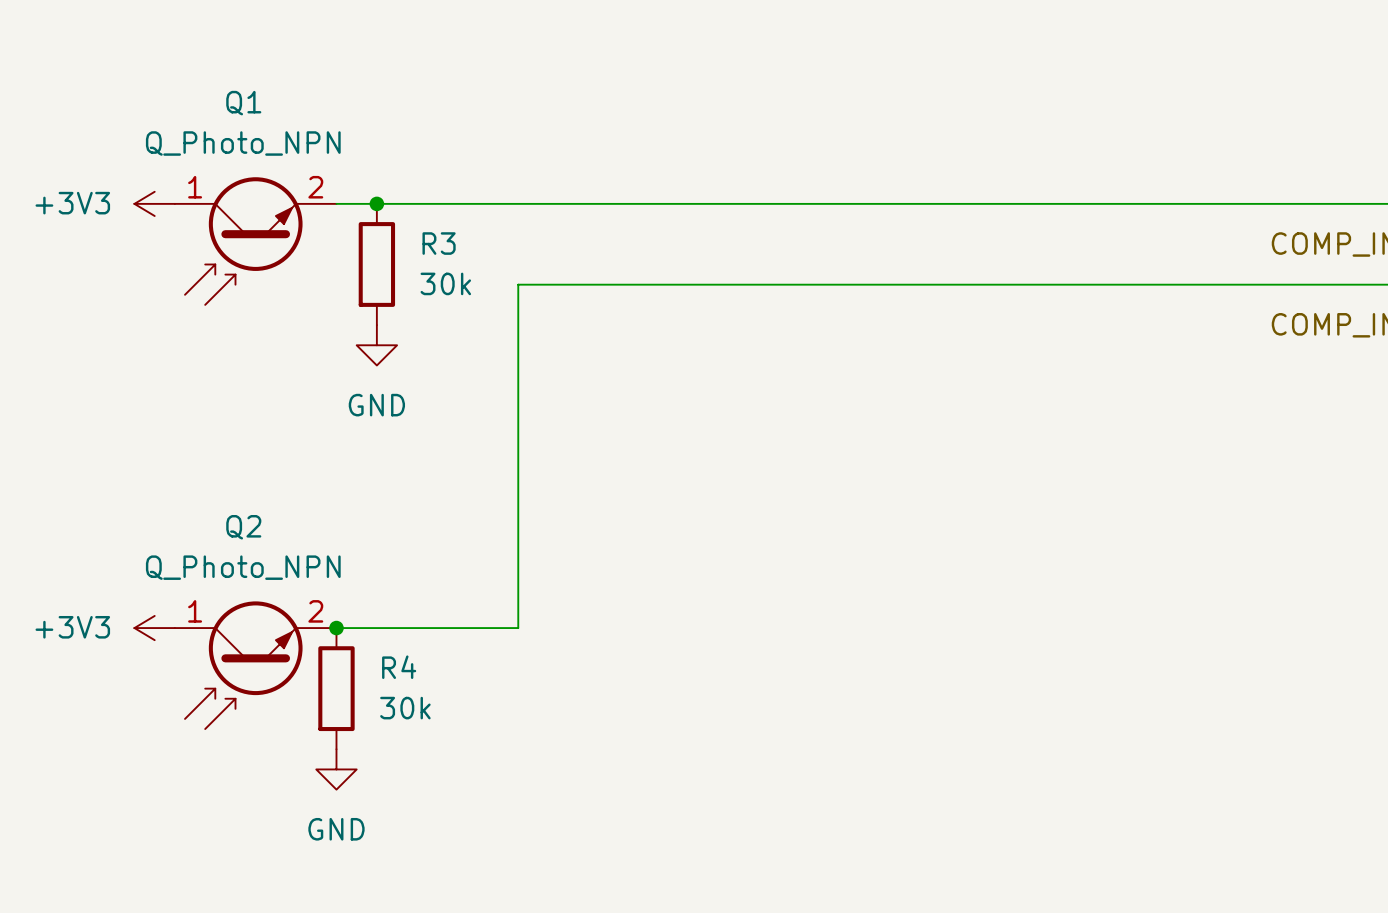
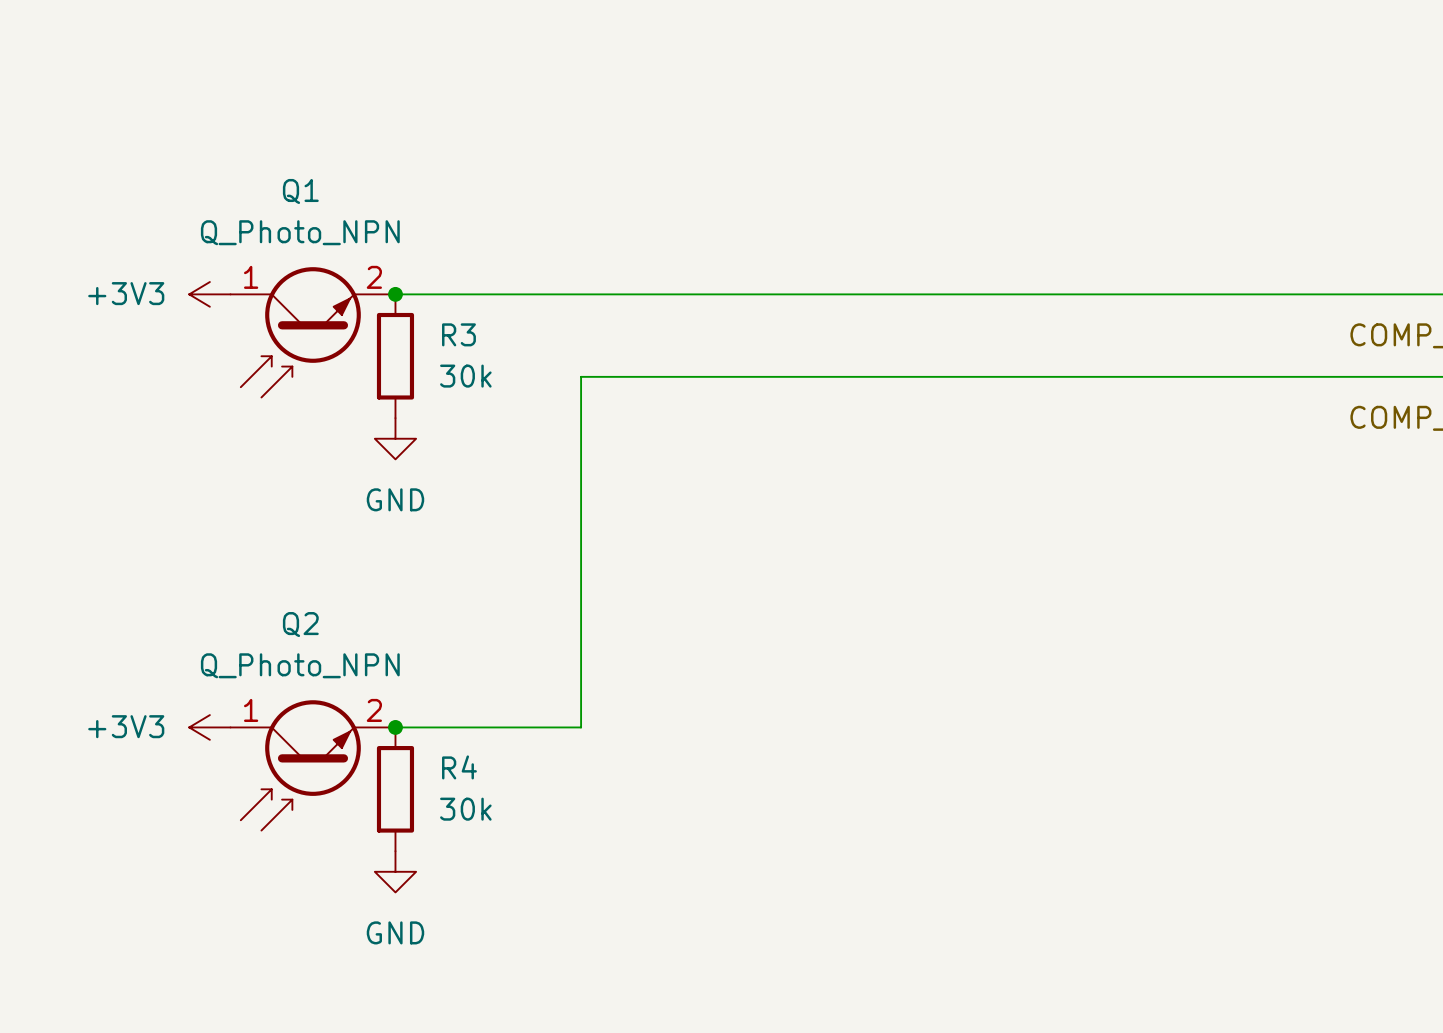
junction position: (376, 203) -> (395, 294)
R3 position: (376, 264) -> (395, 356)
power symbol position: GND (376, 345) -> GND (395, 438)

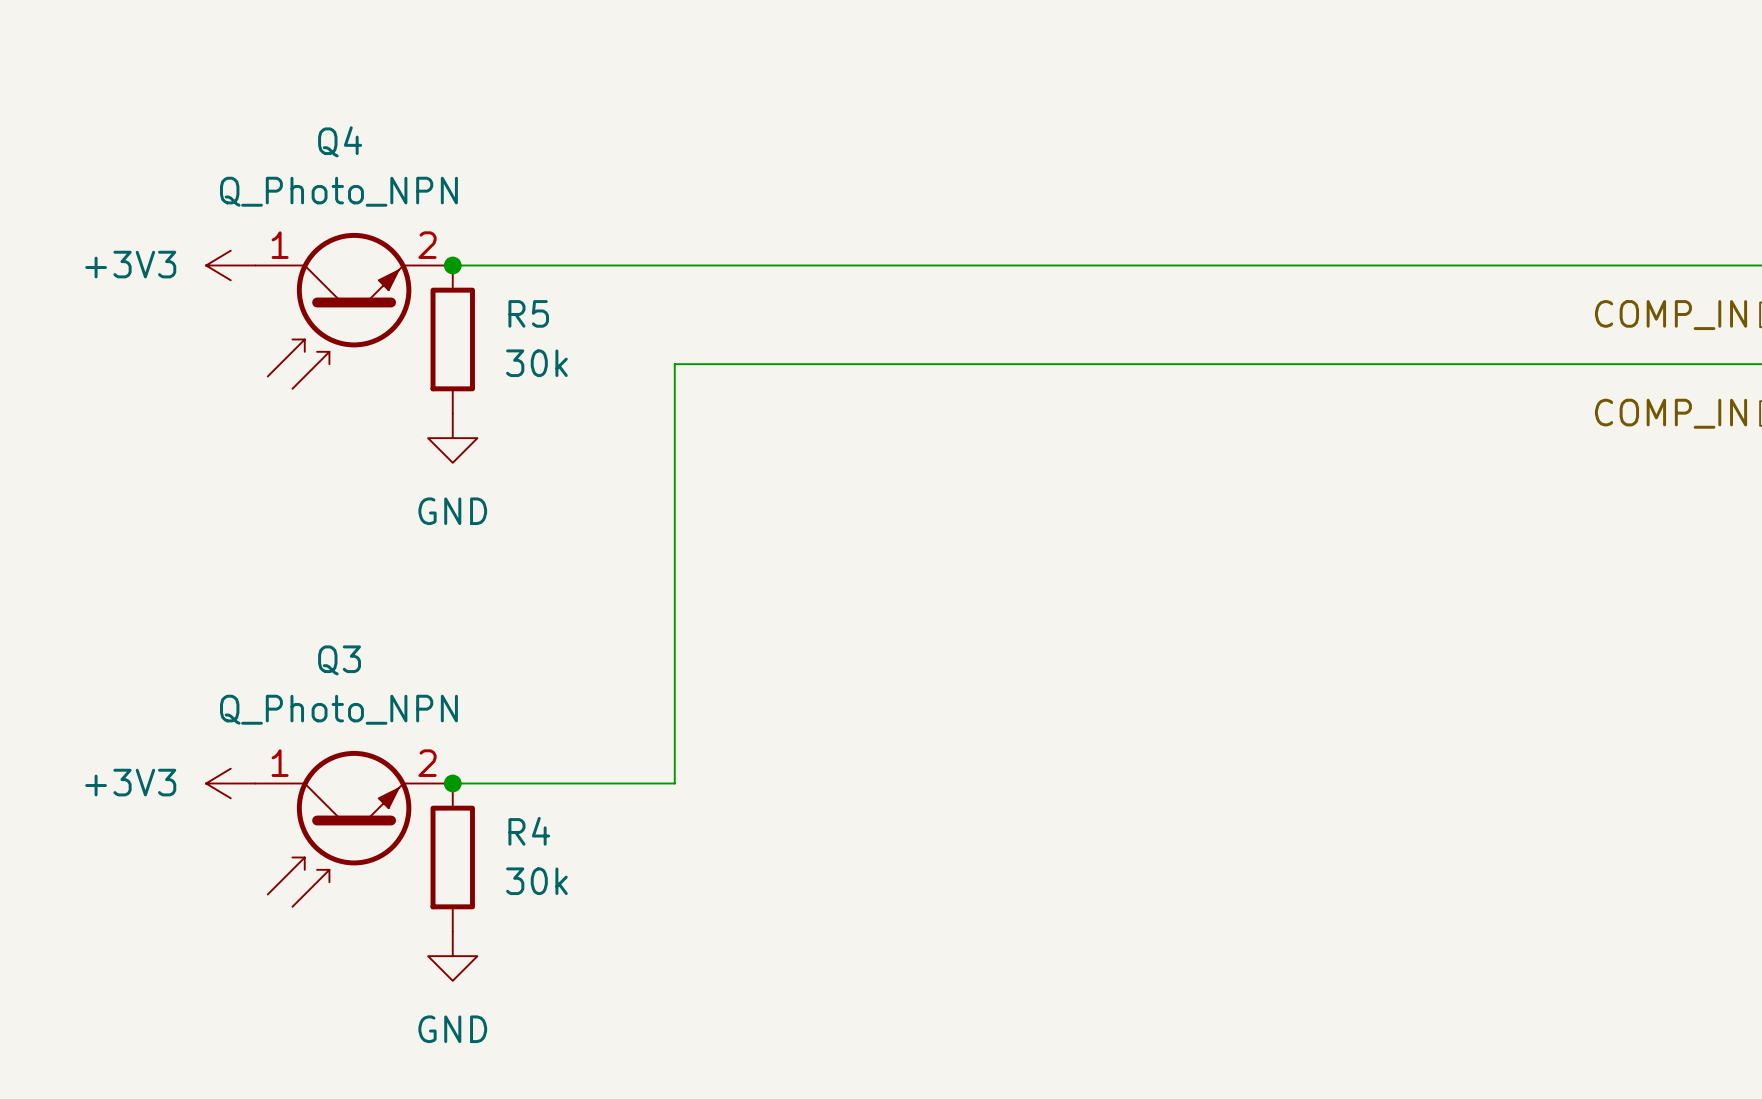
Q1 name: Q1 (300, 191) -> Q4 (340, 141)
R3 name: R3 (458, 334) -> R5 (528, 313)
Q2 name: Q2 (300, 624) -> Q3 (339, 660)

